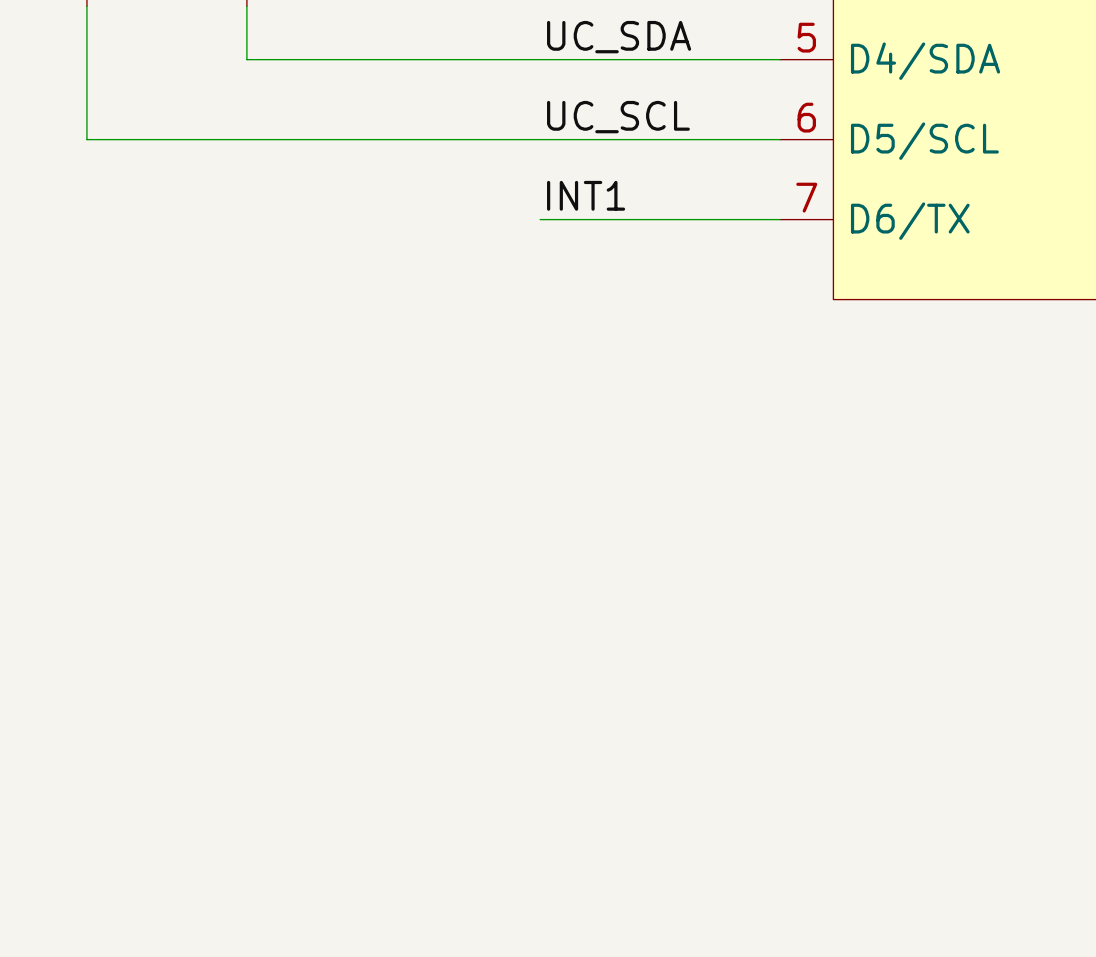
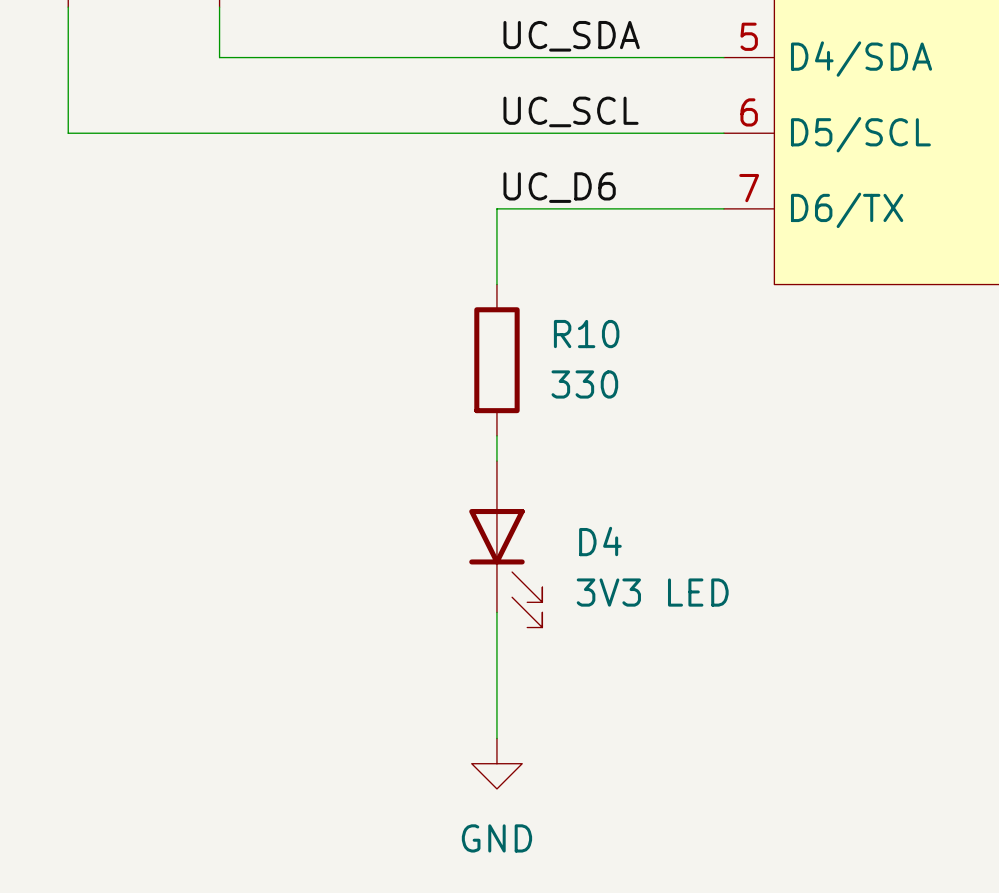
label: INT1 (586, 195) -> UC_D6 (559, 187)
wire: none -> (496, 208) (496, 284)
R10: none -> 330 (496, 360)
wire: none -> (496, 435) (496, 461)
D4: none -> 3V3 LED (505, 544)
wire: none -> (496, 612) (496, 738)
power symbol: none -> GND (496, 763)

